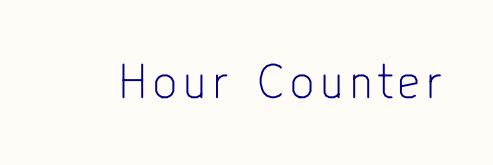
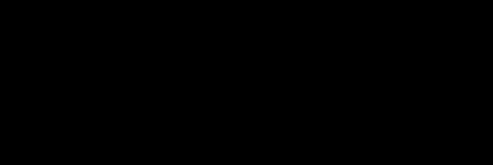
text: Hour Counter (281, 80) -> none

